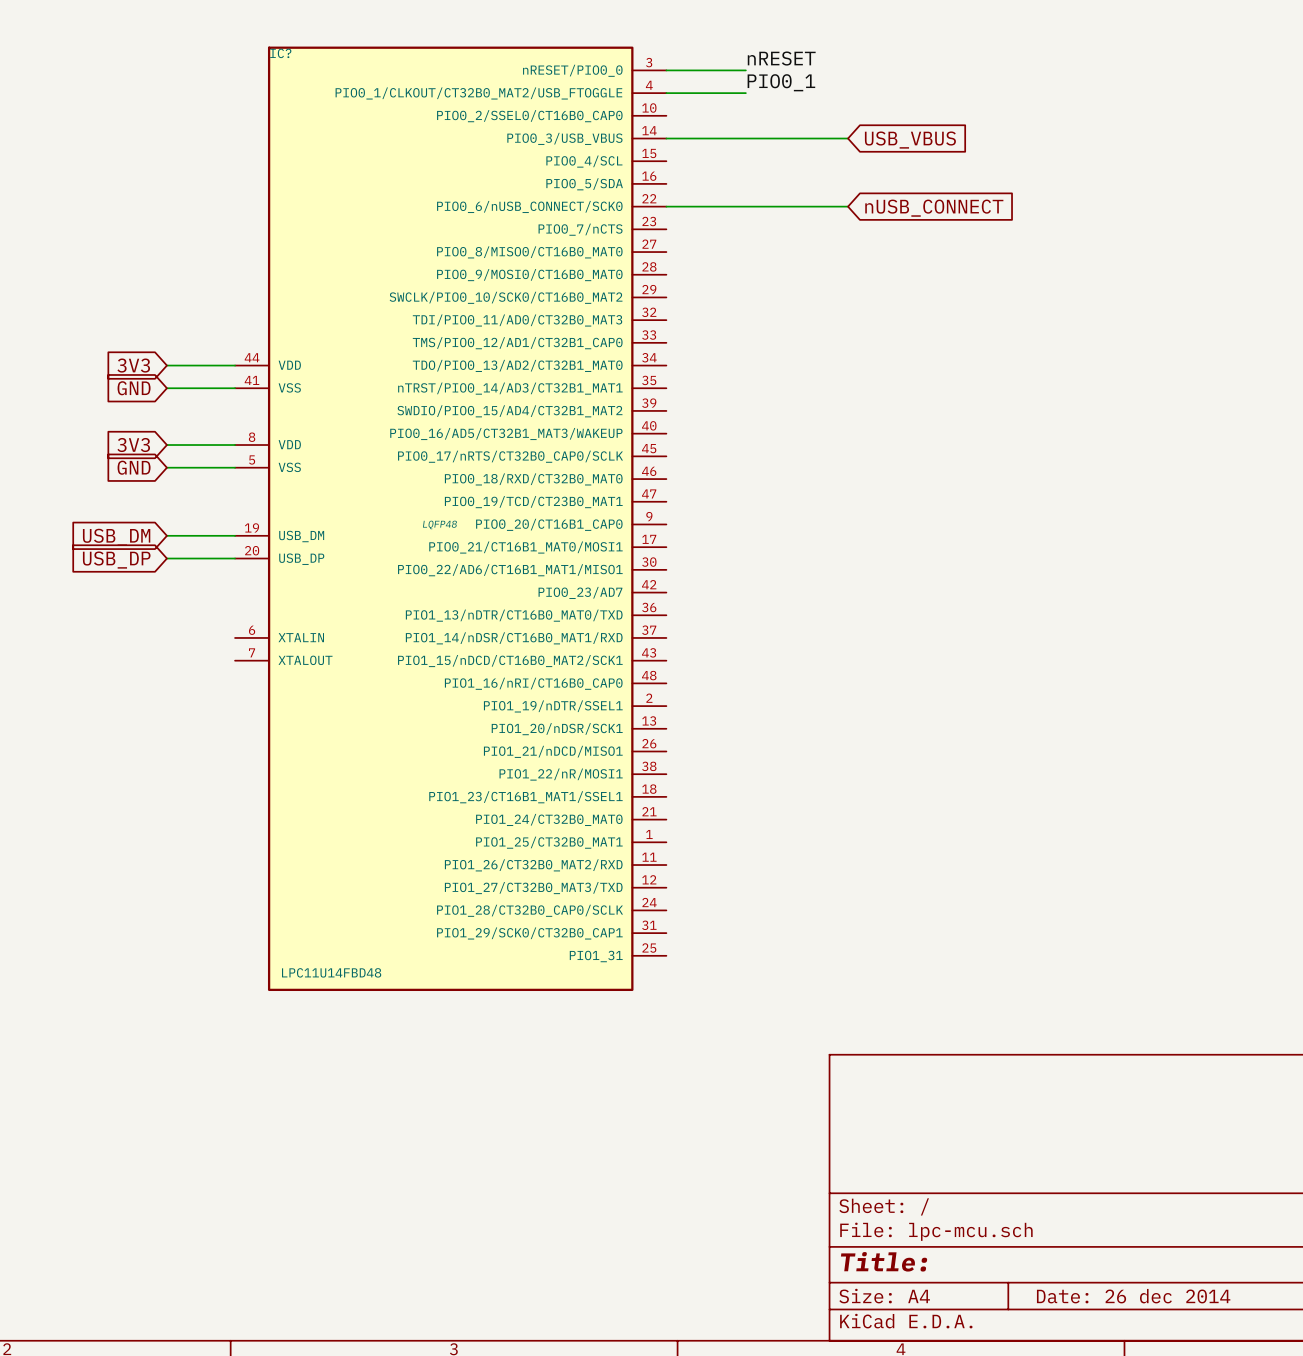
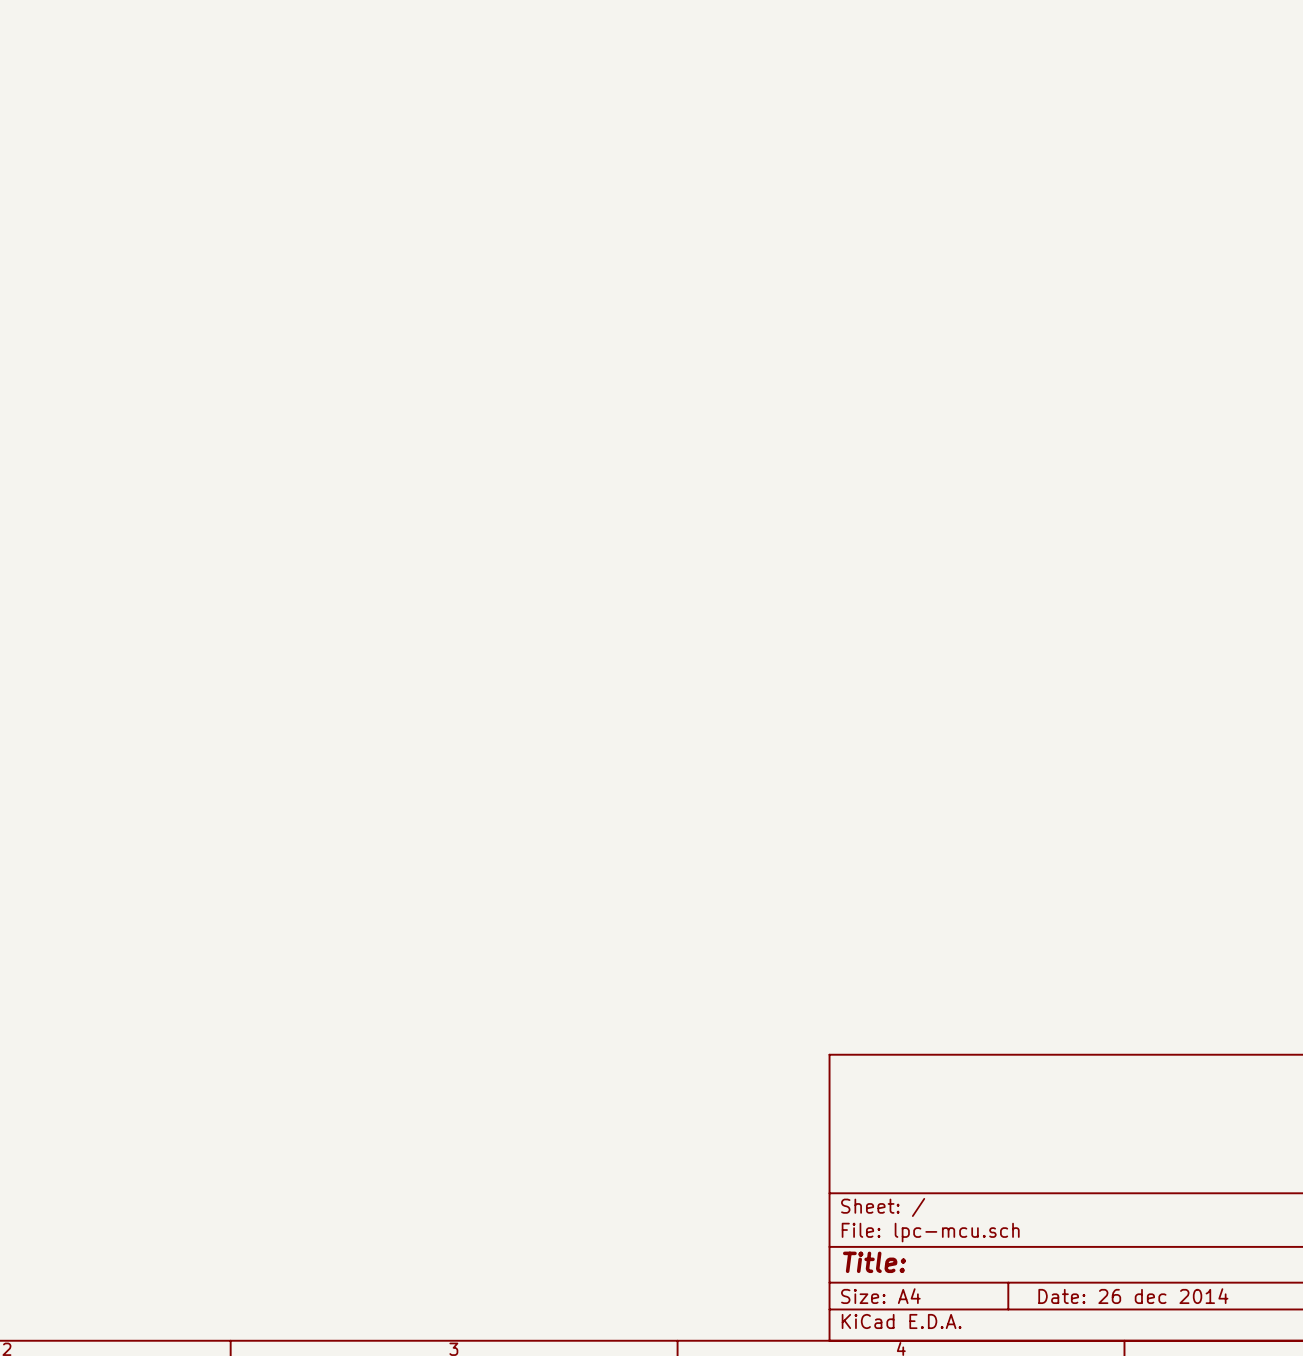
label: nRESET (781, 58) -> none
wire: (666, 70) (745, 70) -> none
label: PIO0_1 (781, 82) -> none
wire: (666, 93) (745, 93) -> none
wire: (666, 138) (848, 138) -> none
global label: USB_VBUS (910, 140) -> none
wire: (666, 206) (848, 206) -> none
global label: nUSB_CONNECT (934, 208) -> none
global label: 3V3 (133, 365) -> none
wire: (166, 365) (235, 365) -> none
global label: GND (134, 388) -> none
wire: (166, 388) (235, 388) -> none
global label: 3V3 (133, 445) -> none
wire: (166, 445) (235, 445) -> none
global label: GND (134, 467) -> none
wire: (166, 467) (235, 467) -> none
IC?: LPC11U14FBD48 (450, 518) -> none
wire: (166, 535) (235, 535) -> none
global label: USB_DM (116, 537) -> none
wire: (166, 558) (235, 558) -> none
global label: USB_DP (116, 560) -> none

